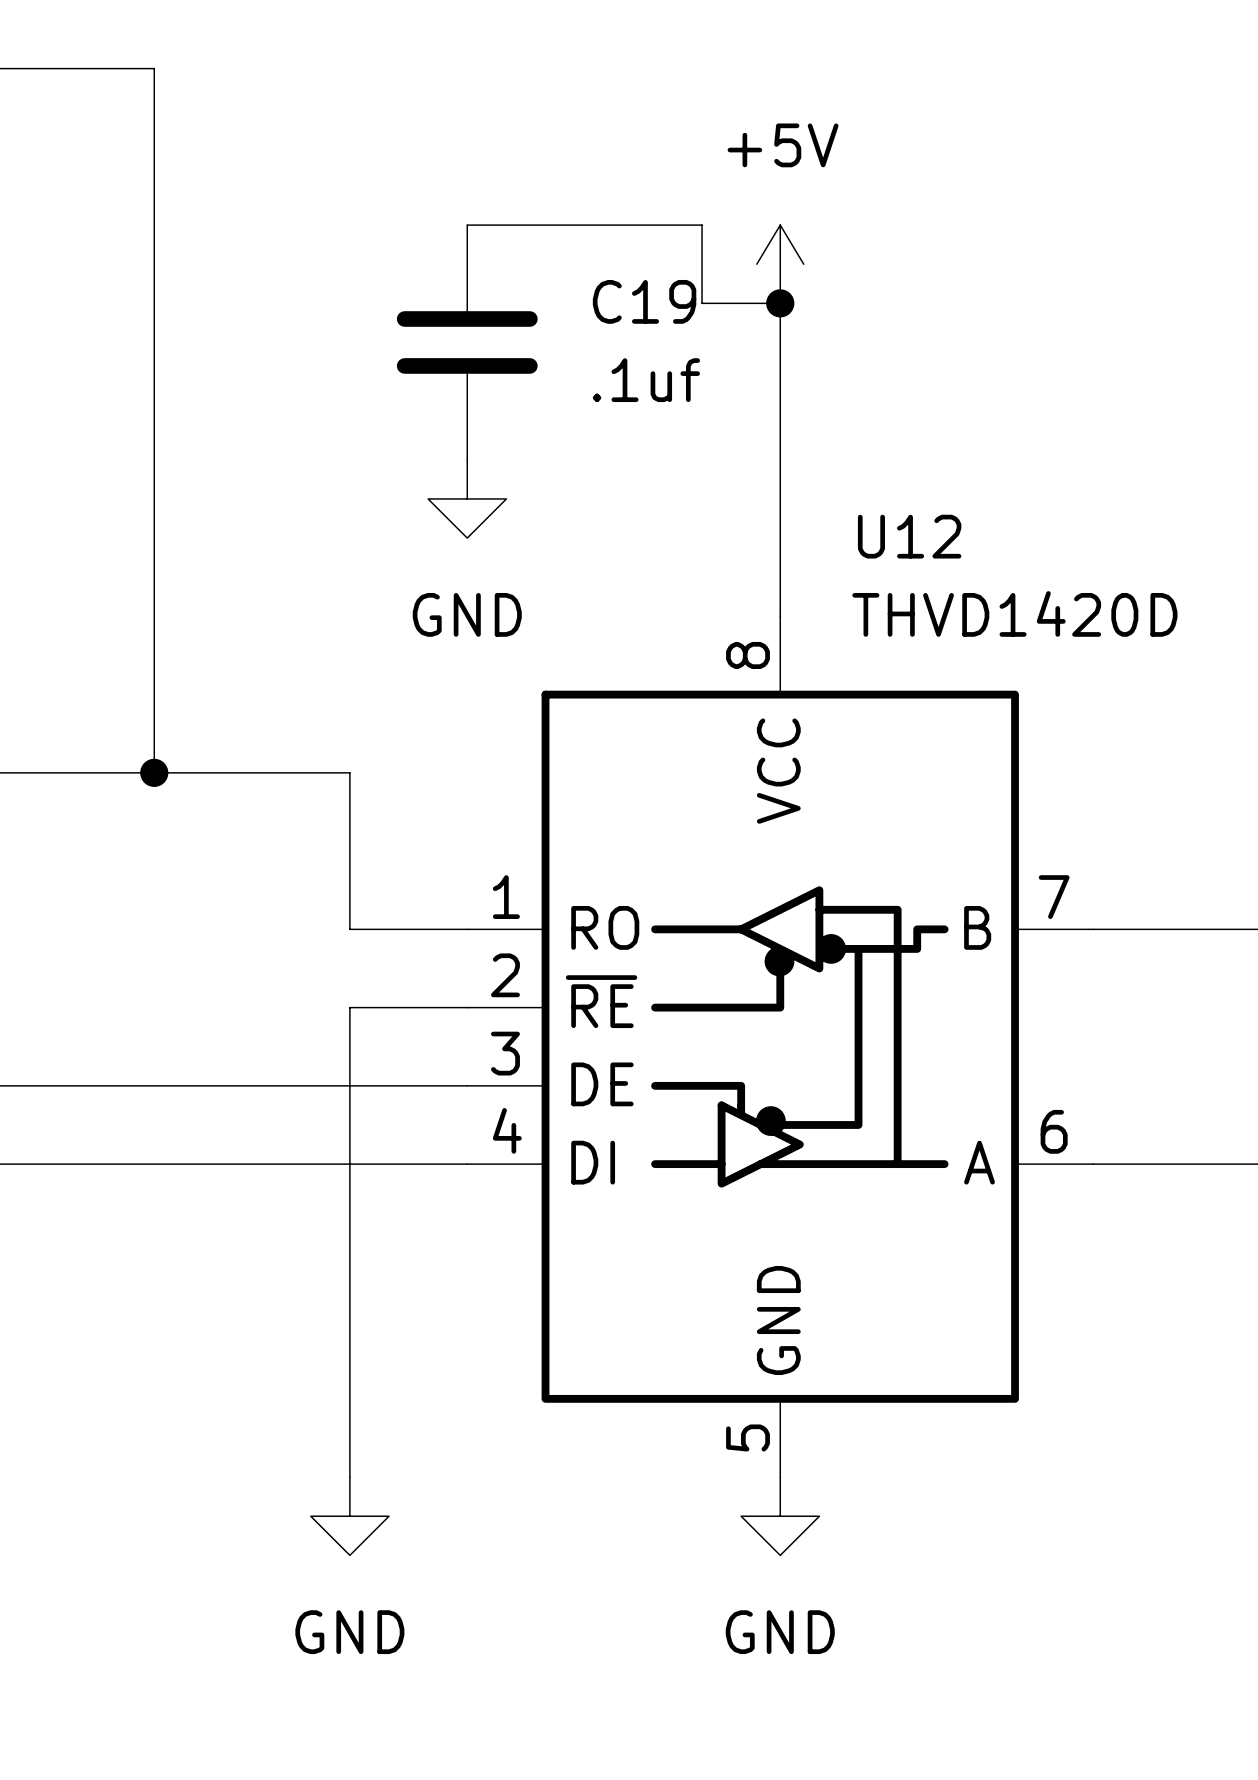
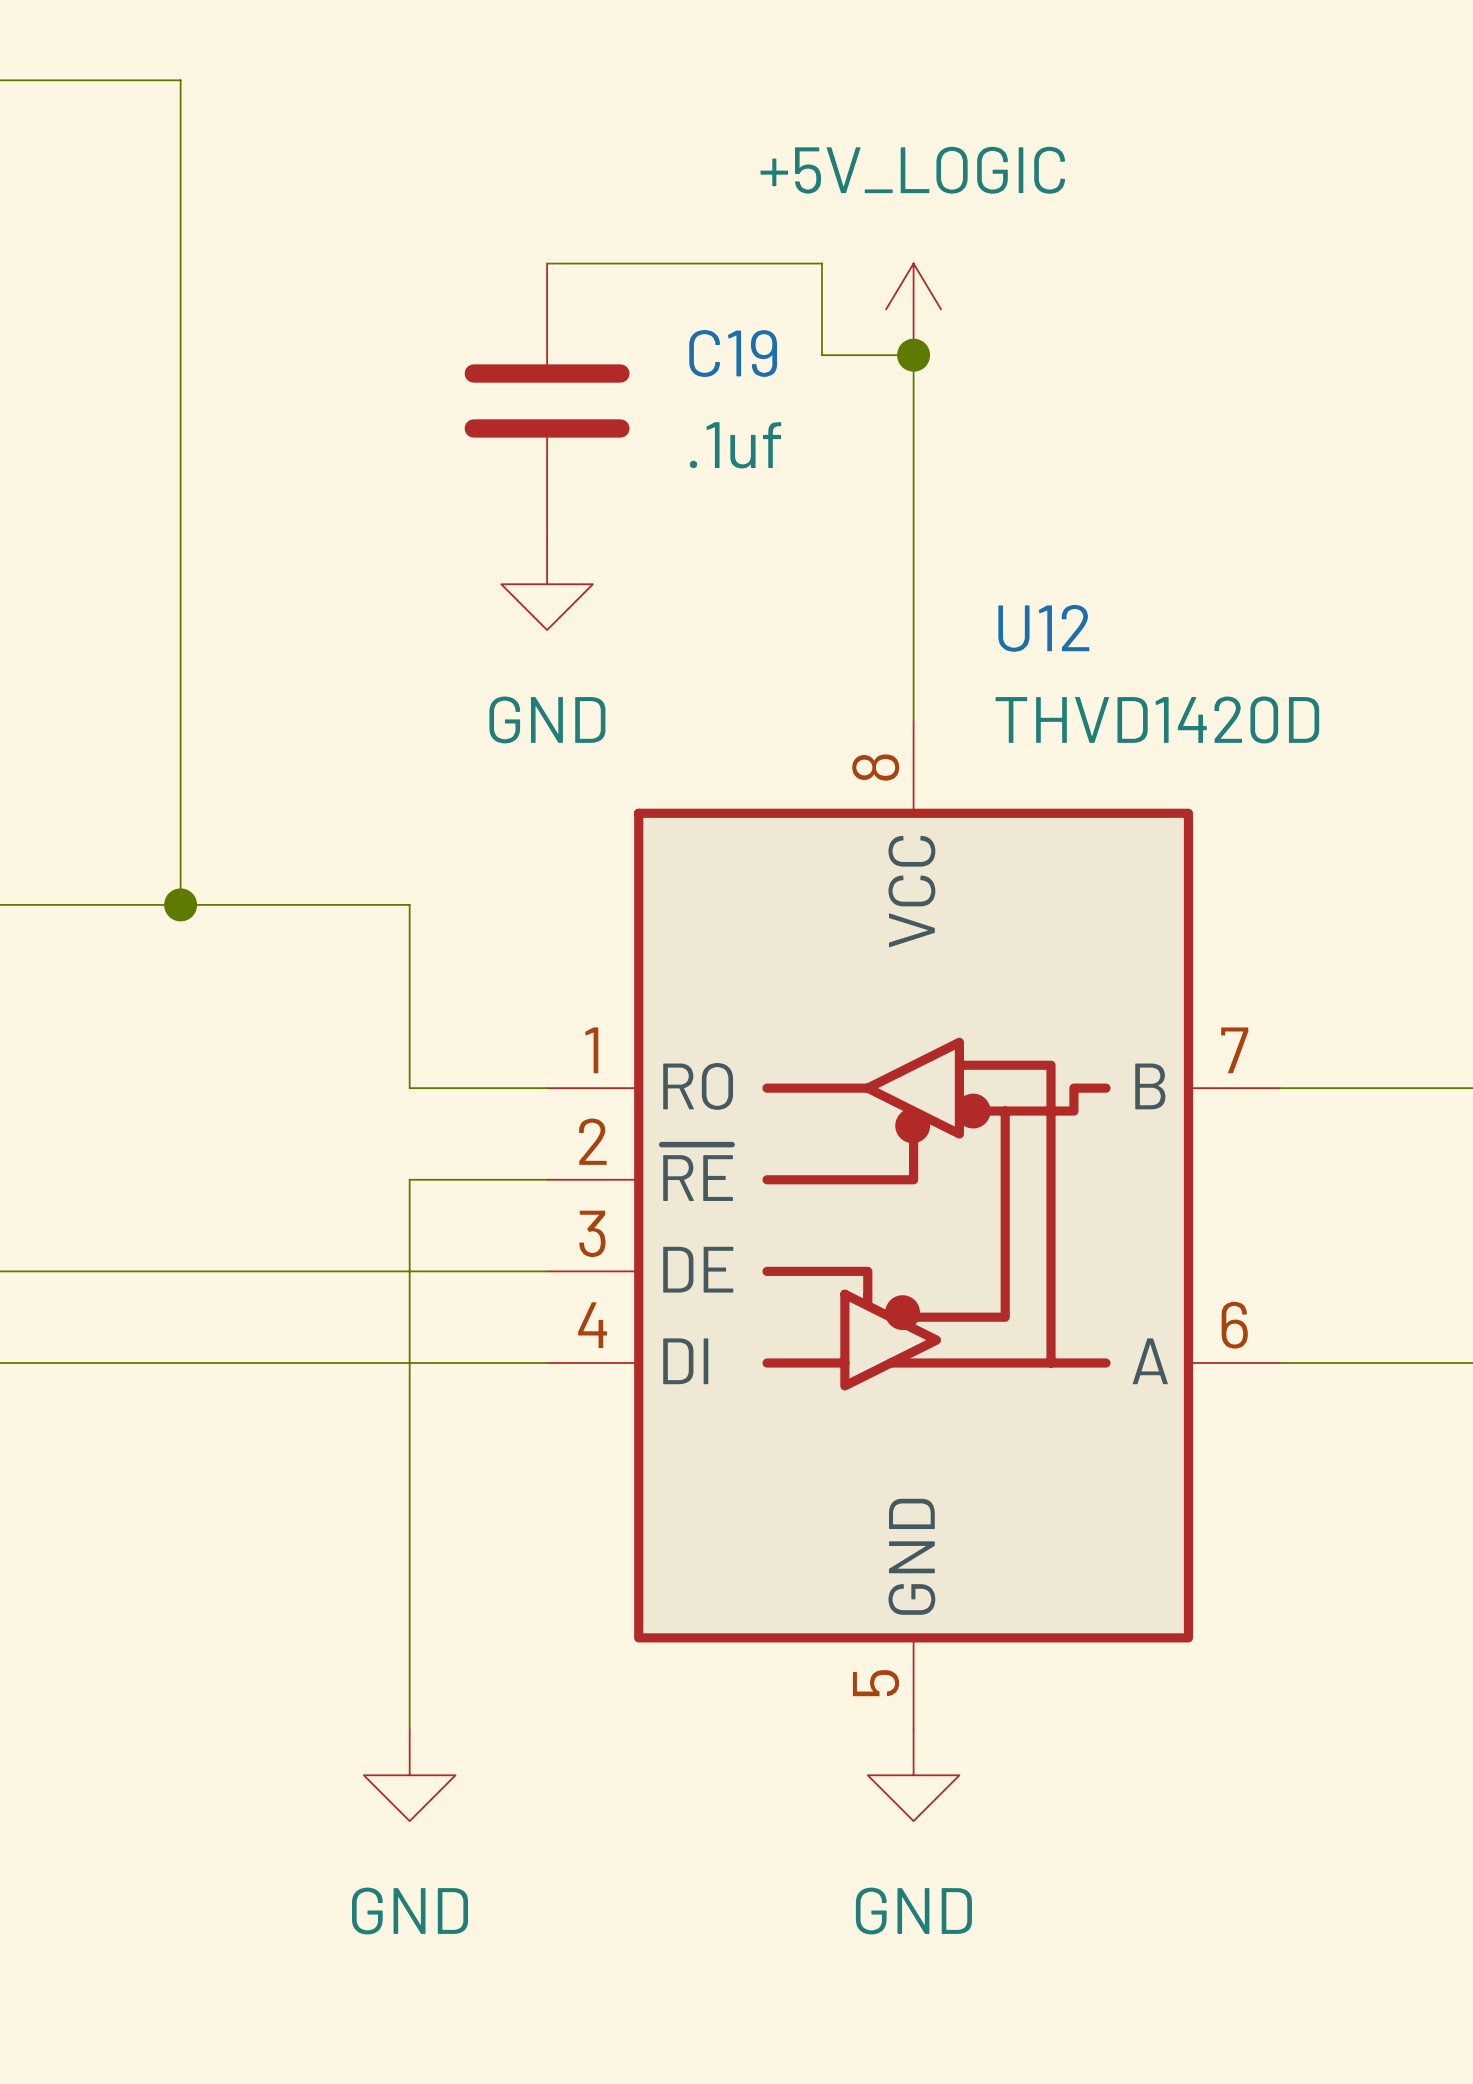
power symbol: +5V (780, 264) -> +5V_LOGIC (913, 309)

